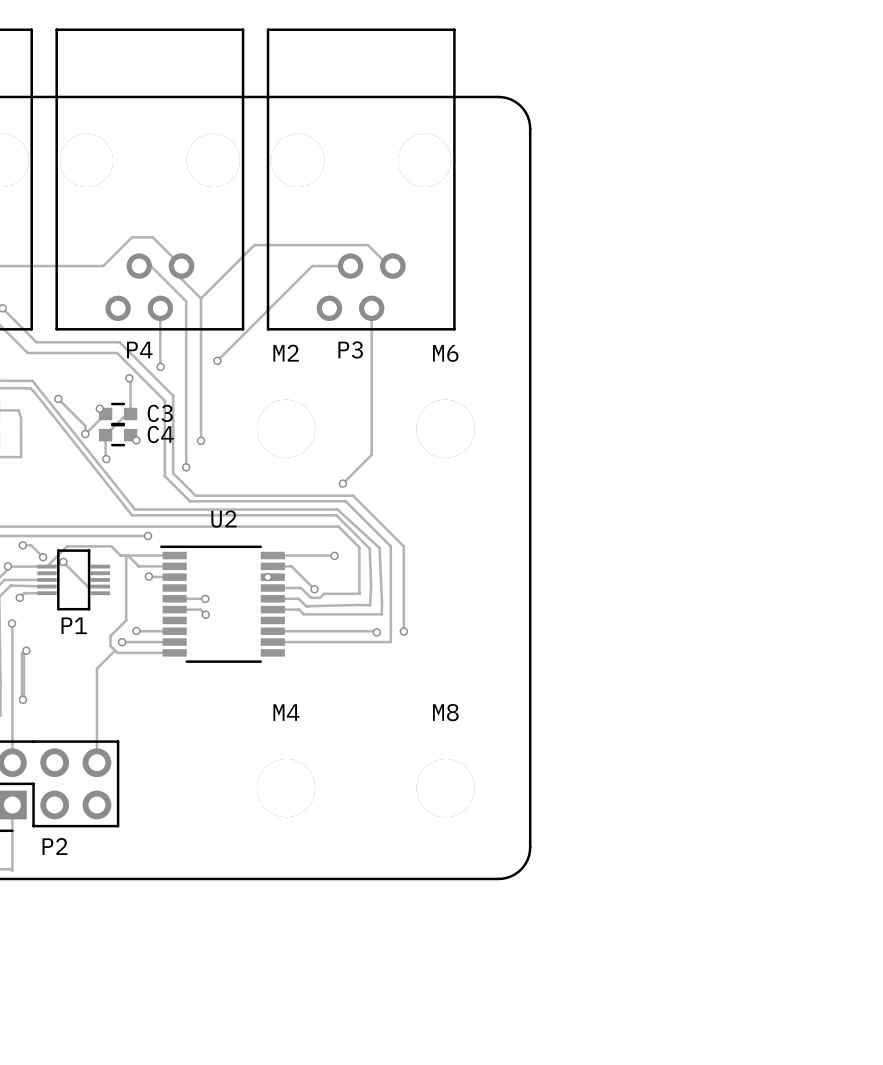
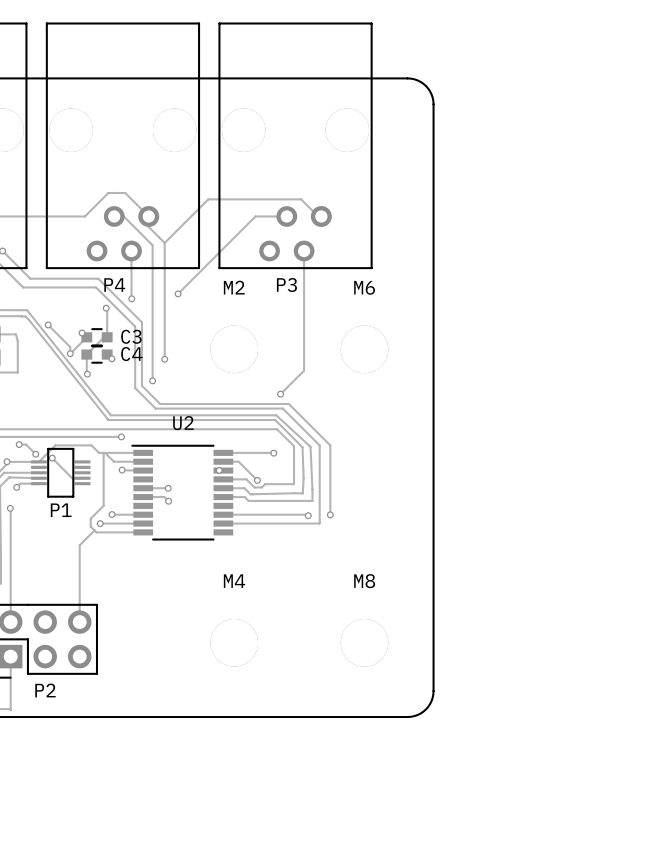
track: (26, 650) (22, 654) (22, 699) -> none
via: (26, 650) -> none
via: (22, 699) -> none

